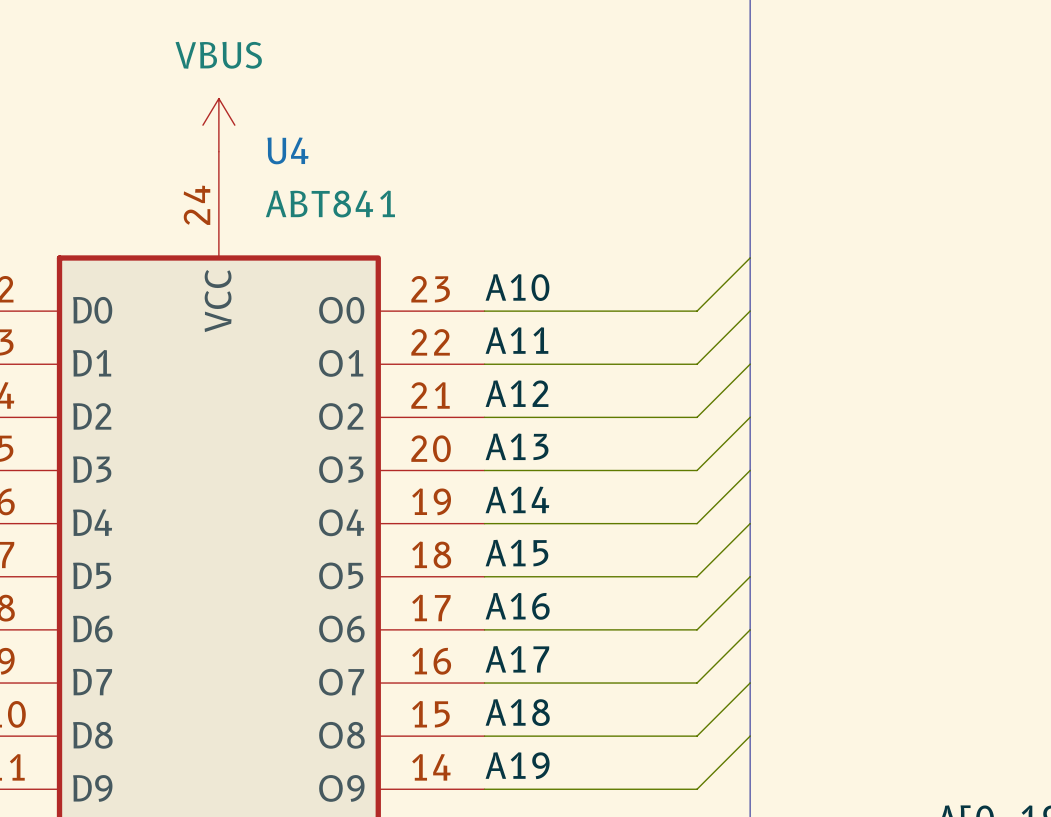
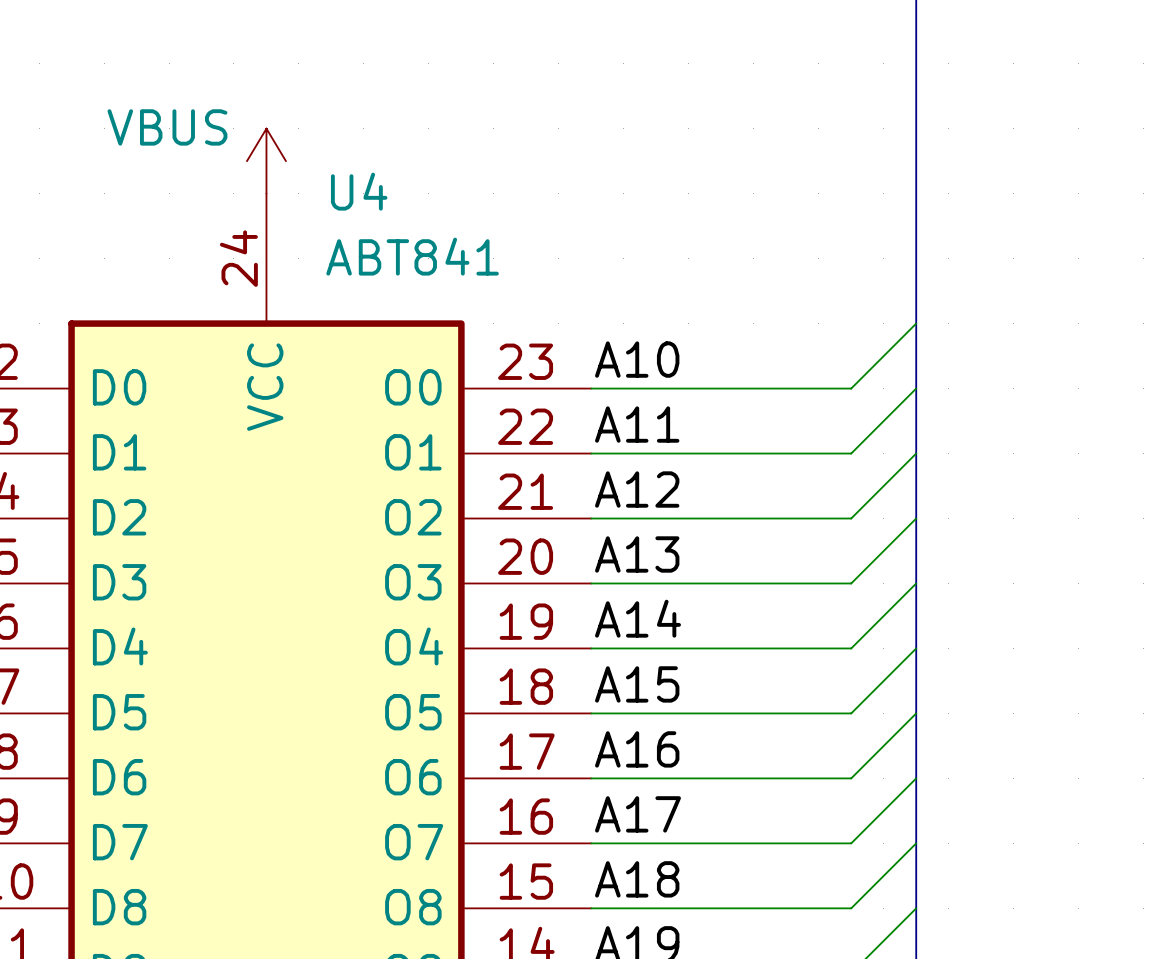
power symbol text position: VBUS (218, 55) -> VBUS (167, 127)

